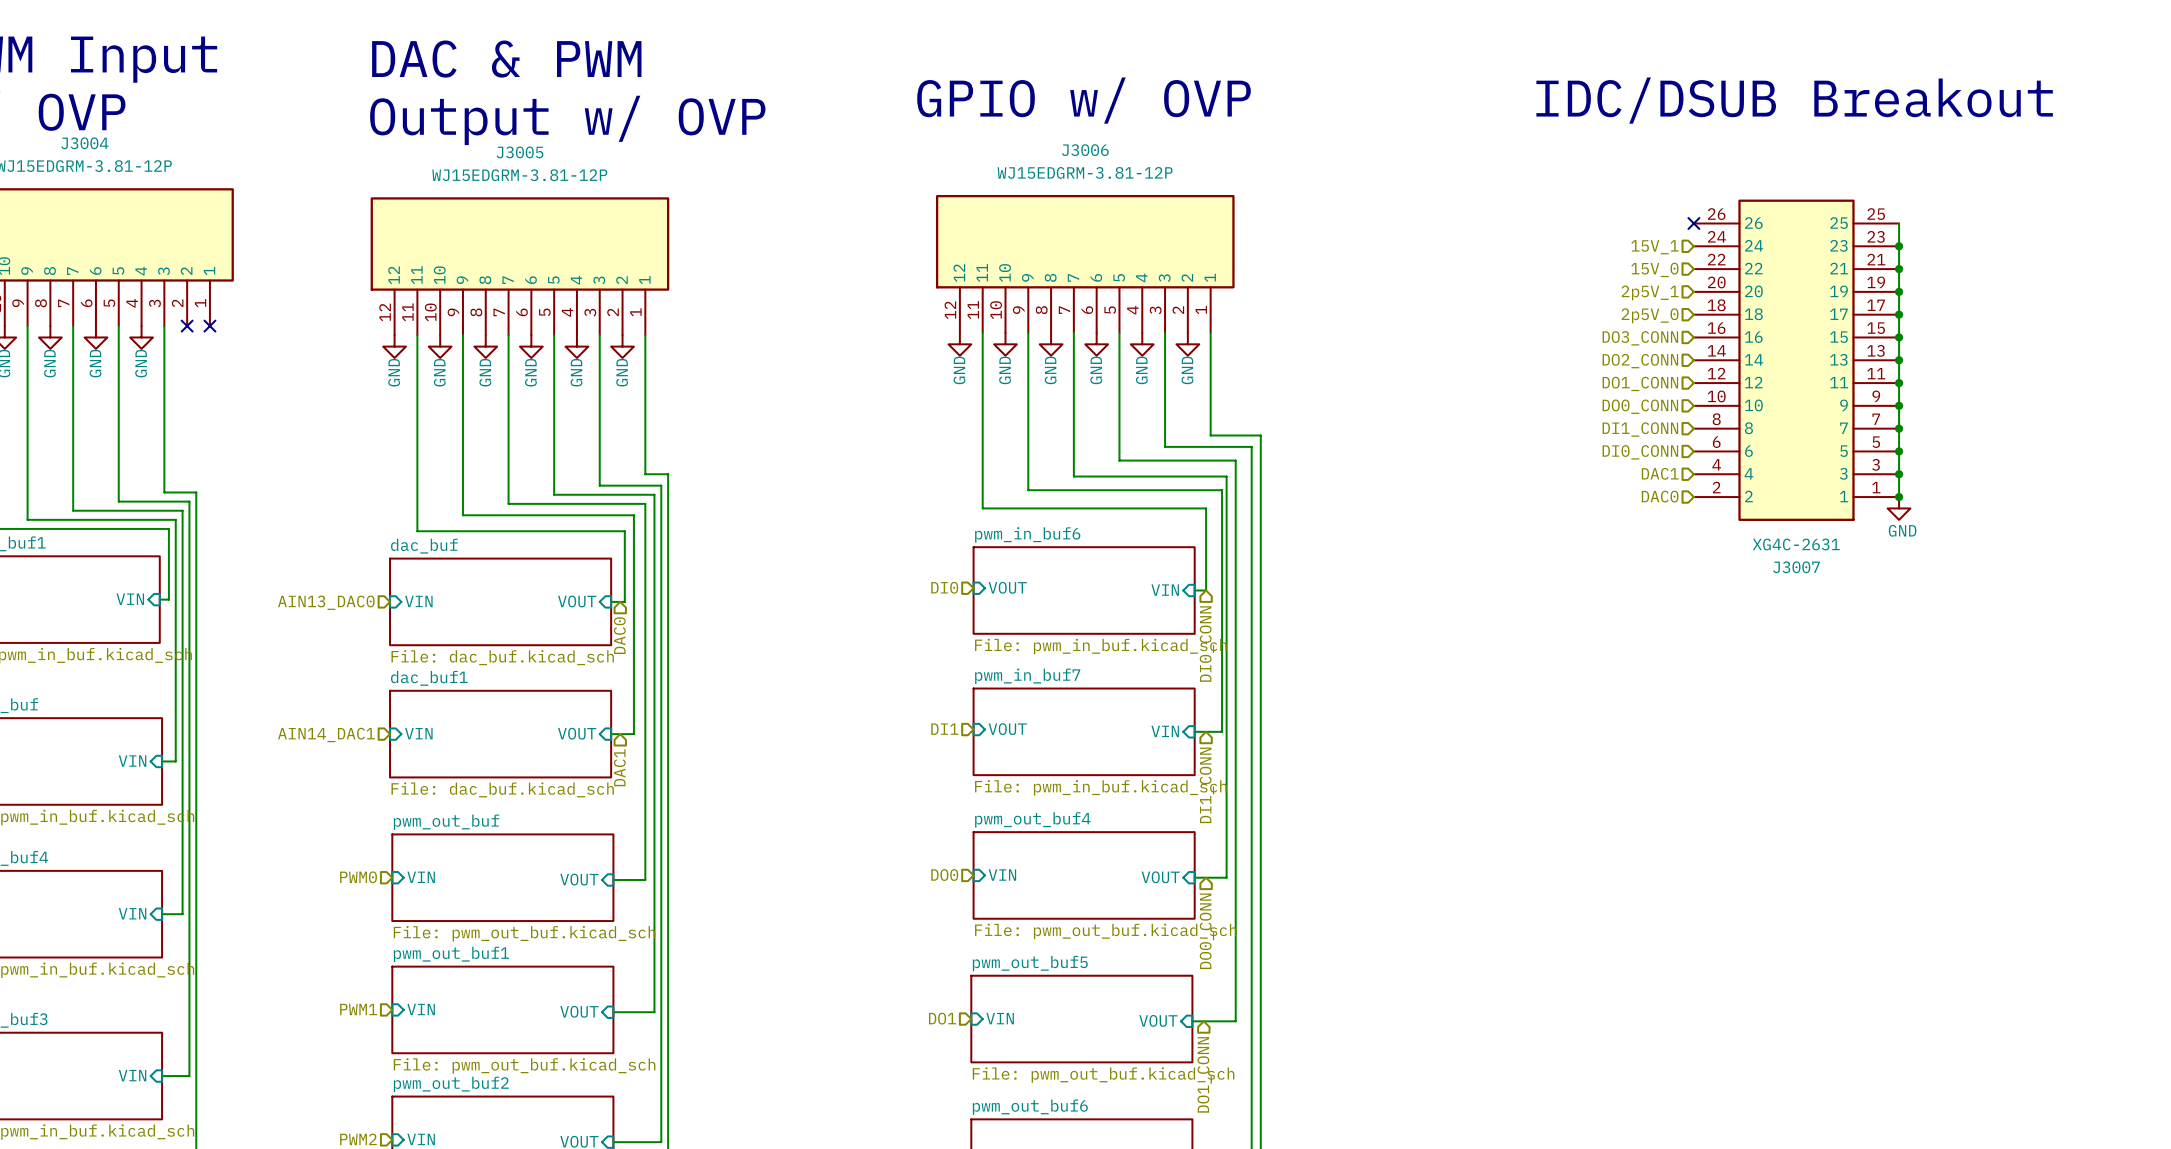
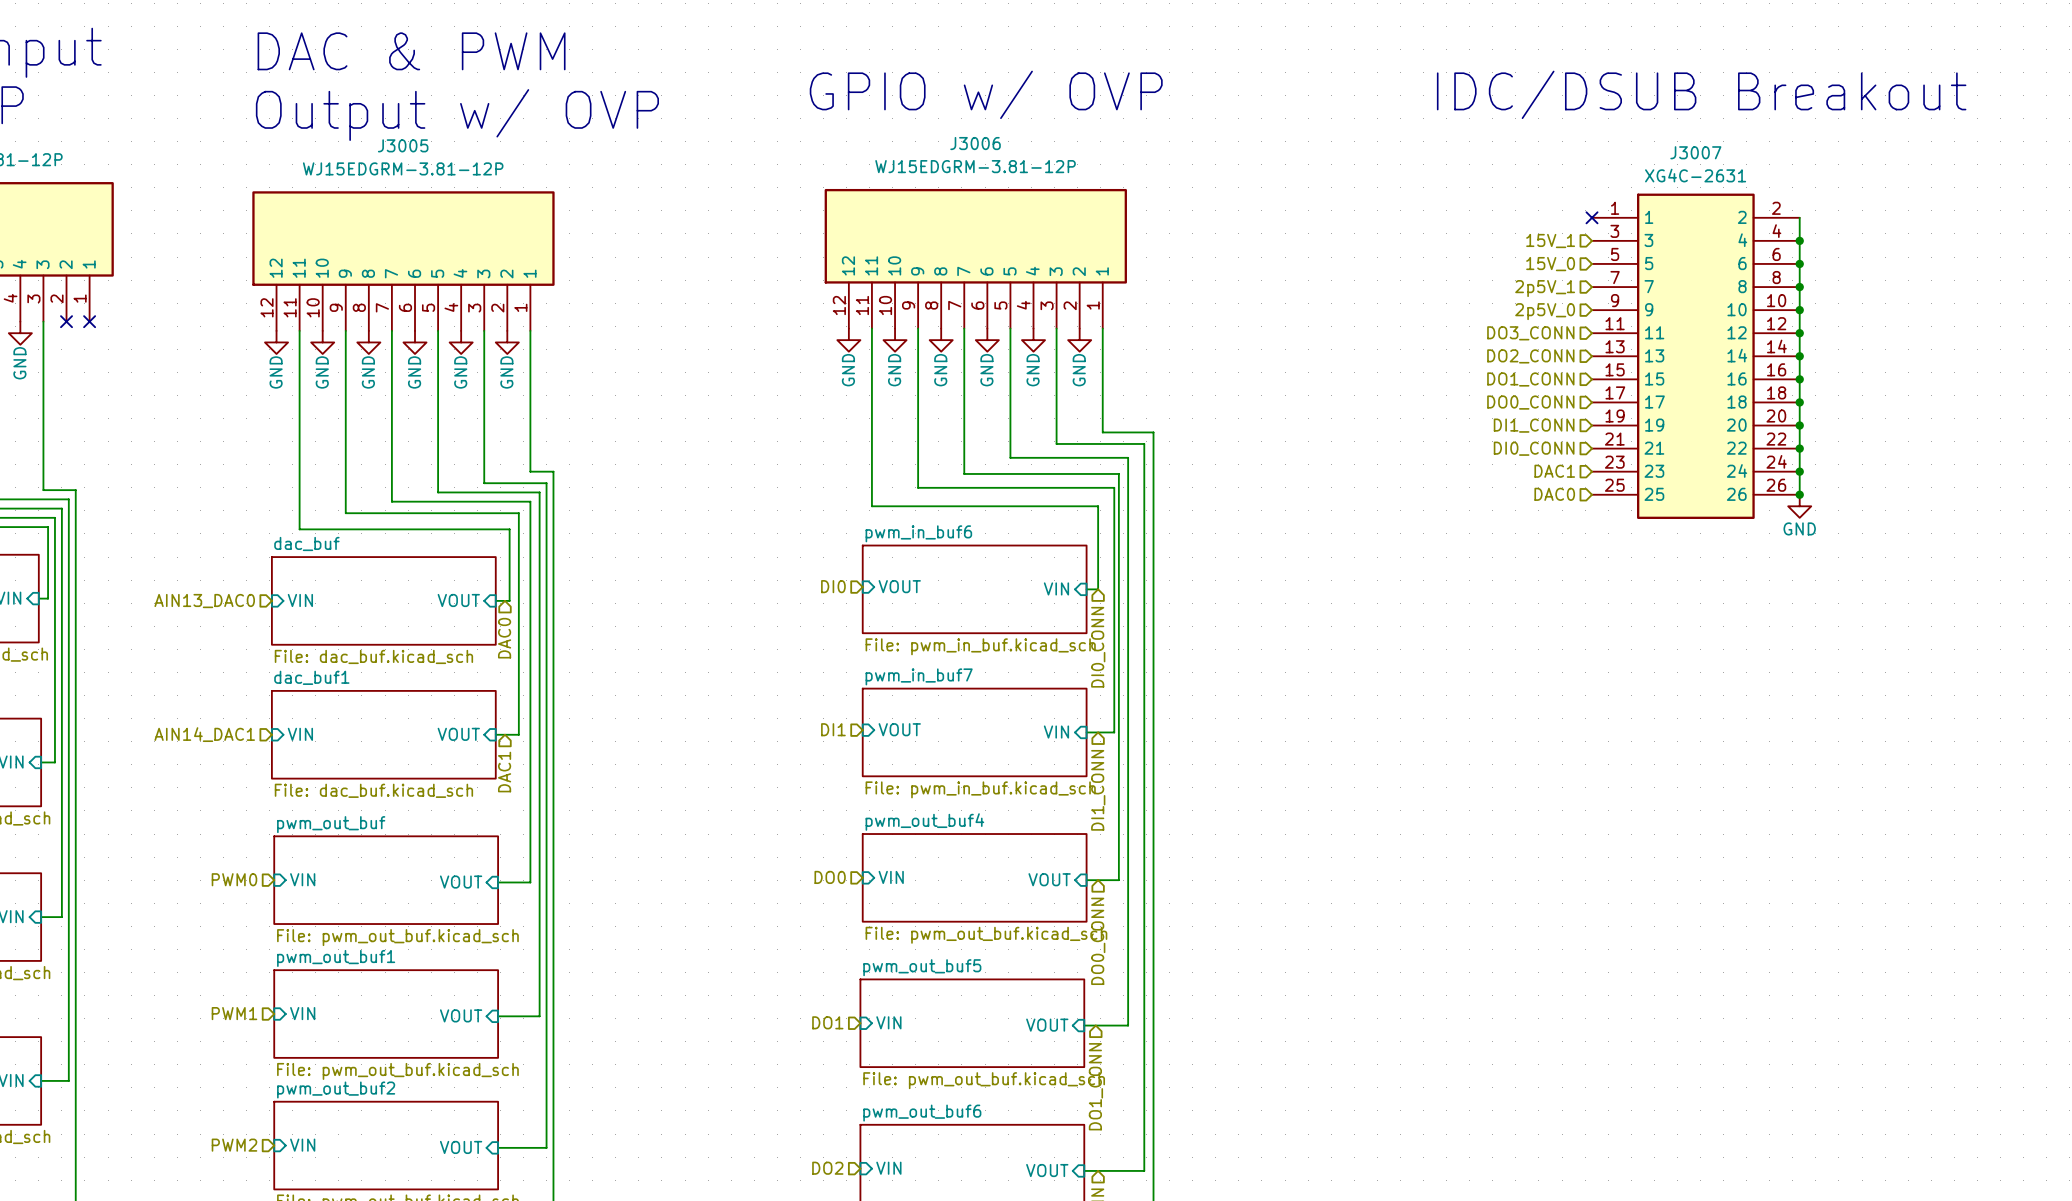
J3007 rotation: 0° (1796, 360) -> 180° (1695, 356)

